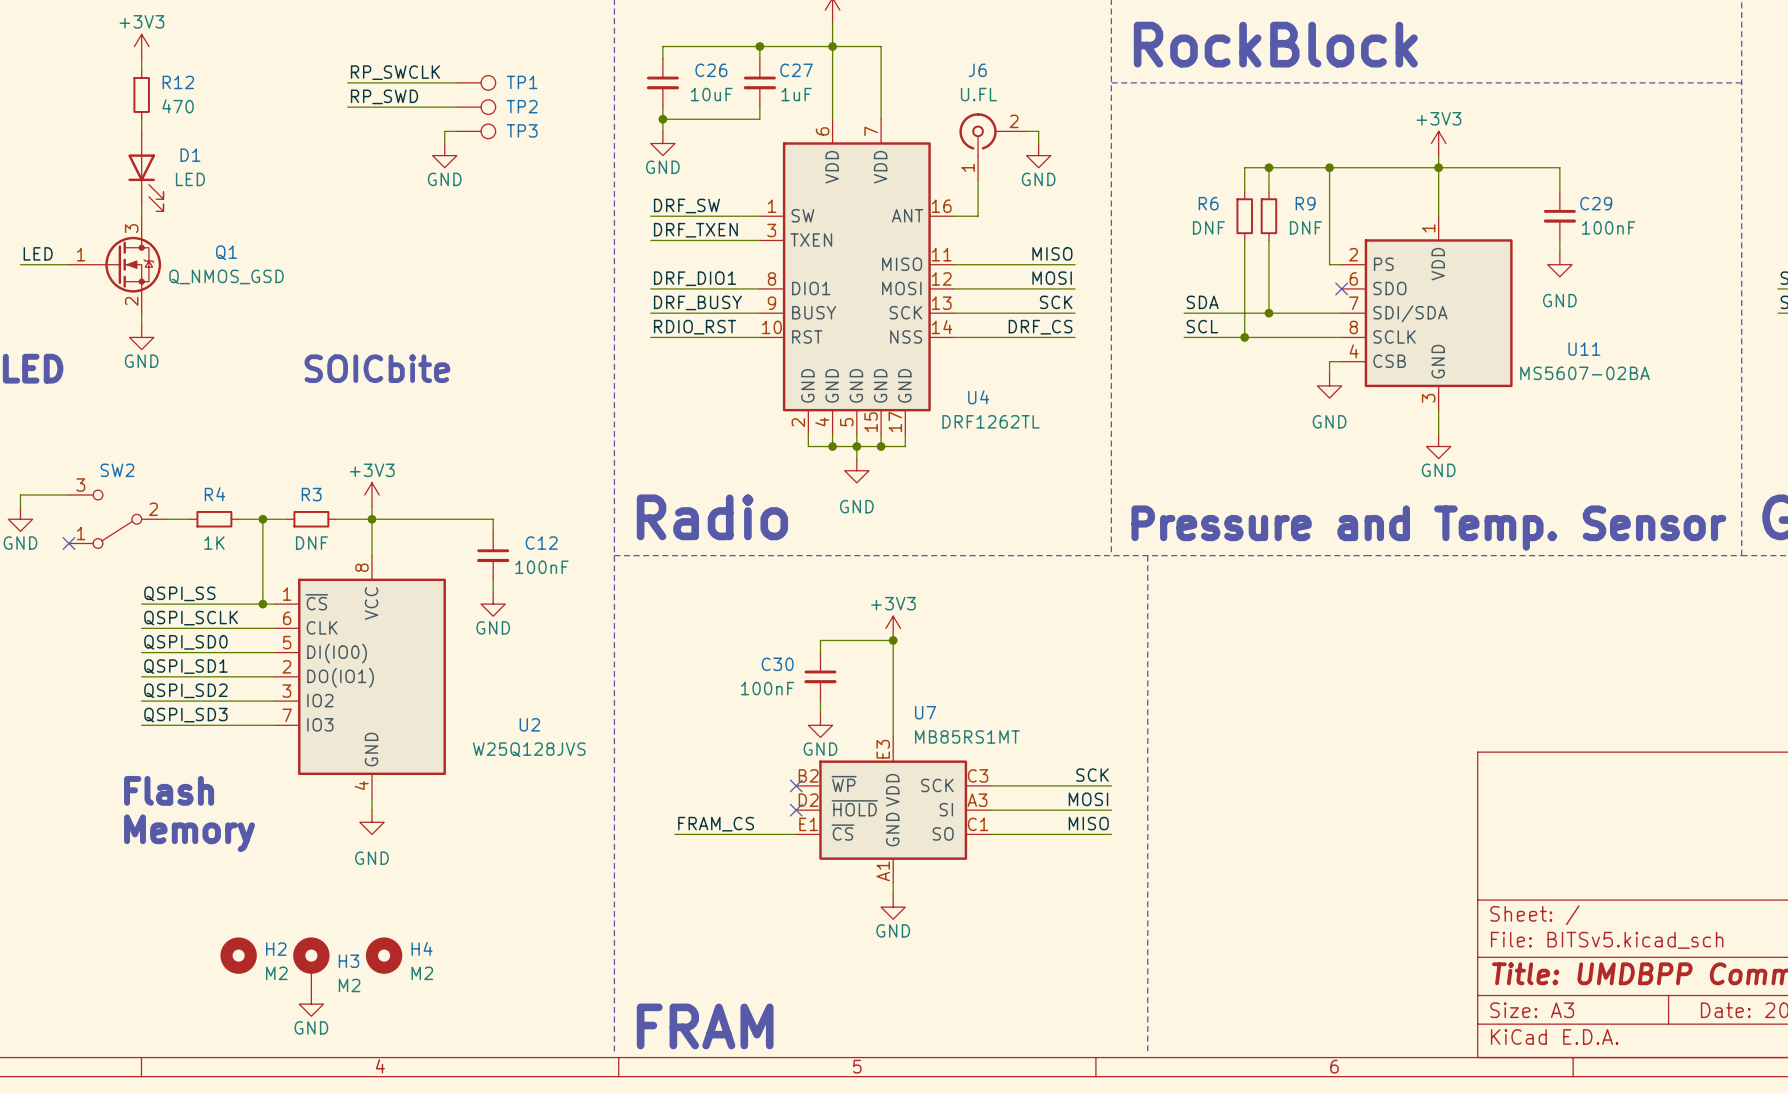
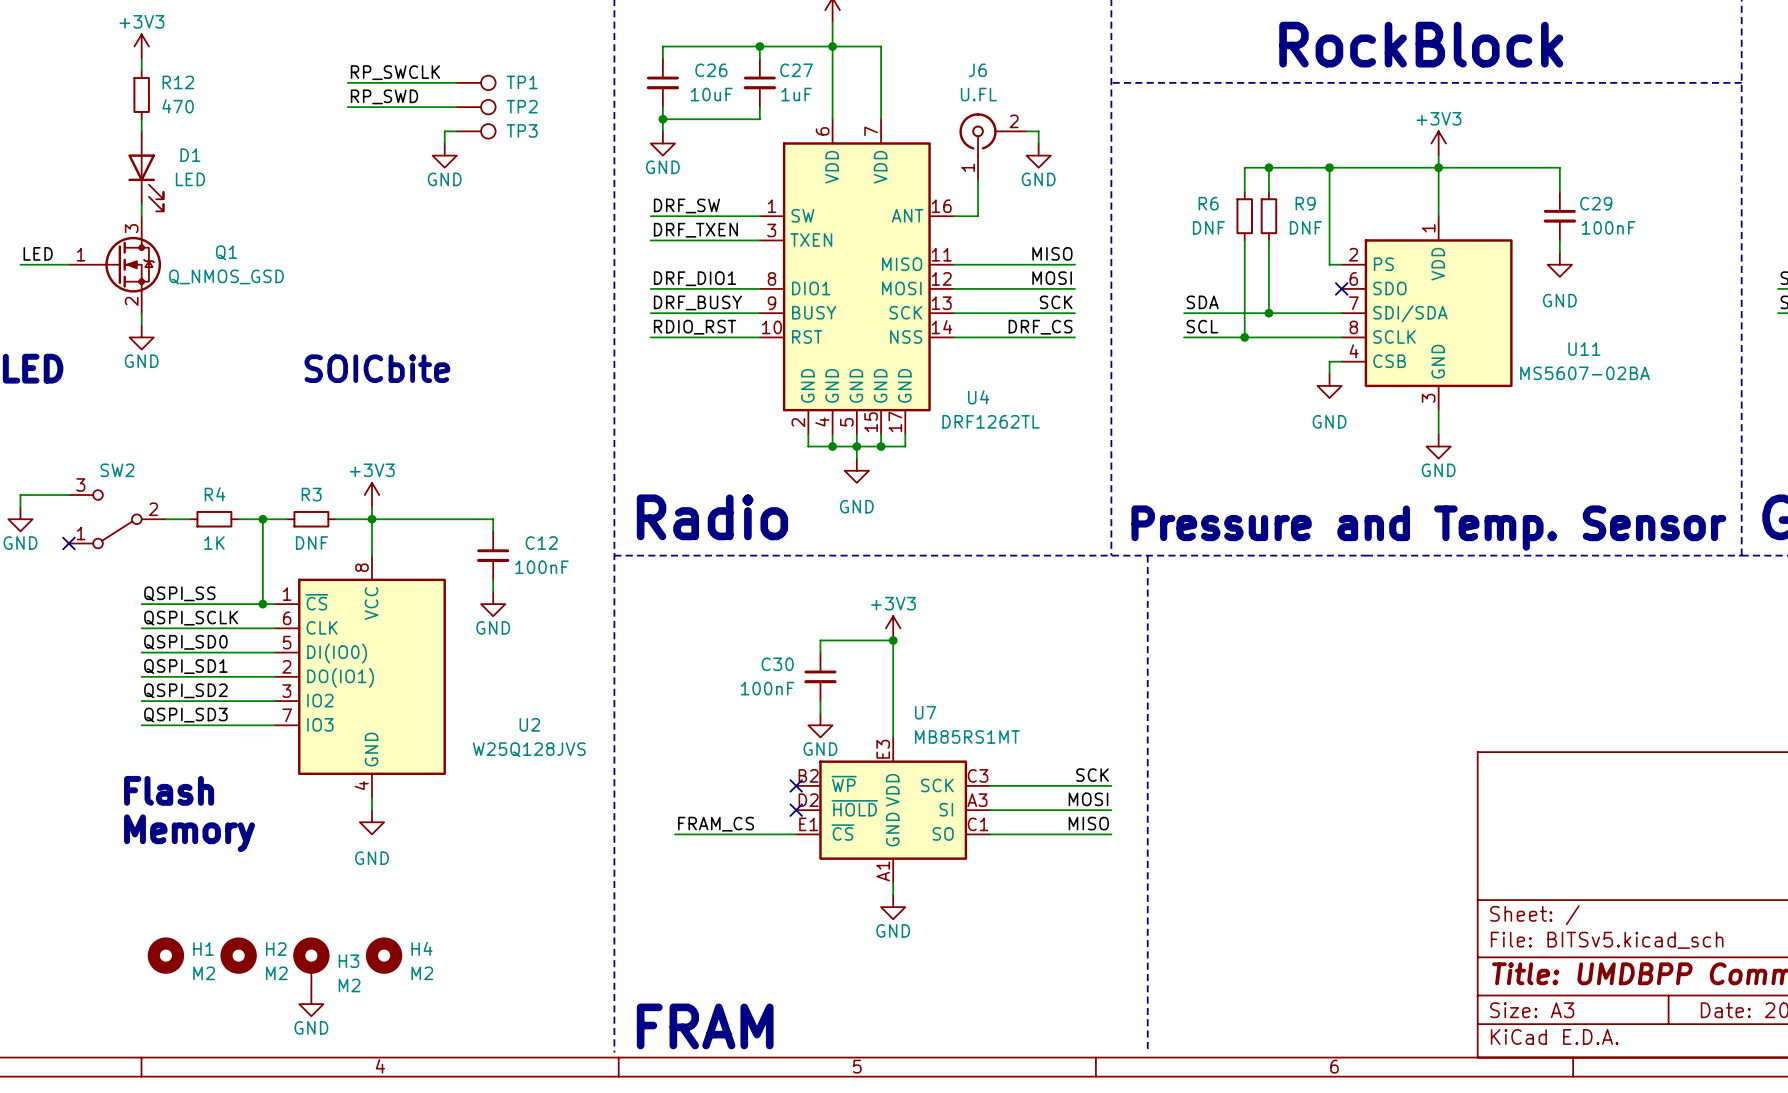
text position: RockBlock (1275, 44) -> RockBlock (1421, 44)
H1: none -> M2 (165, 955)

